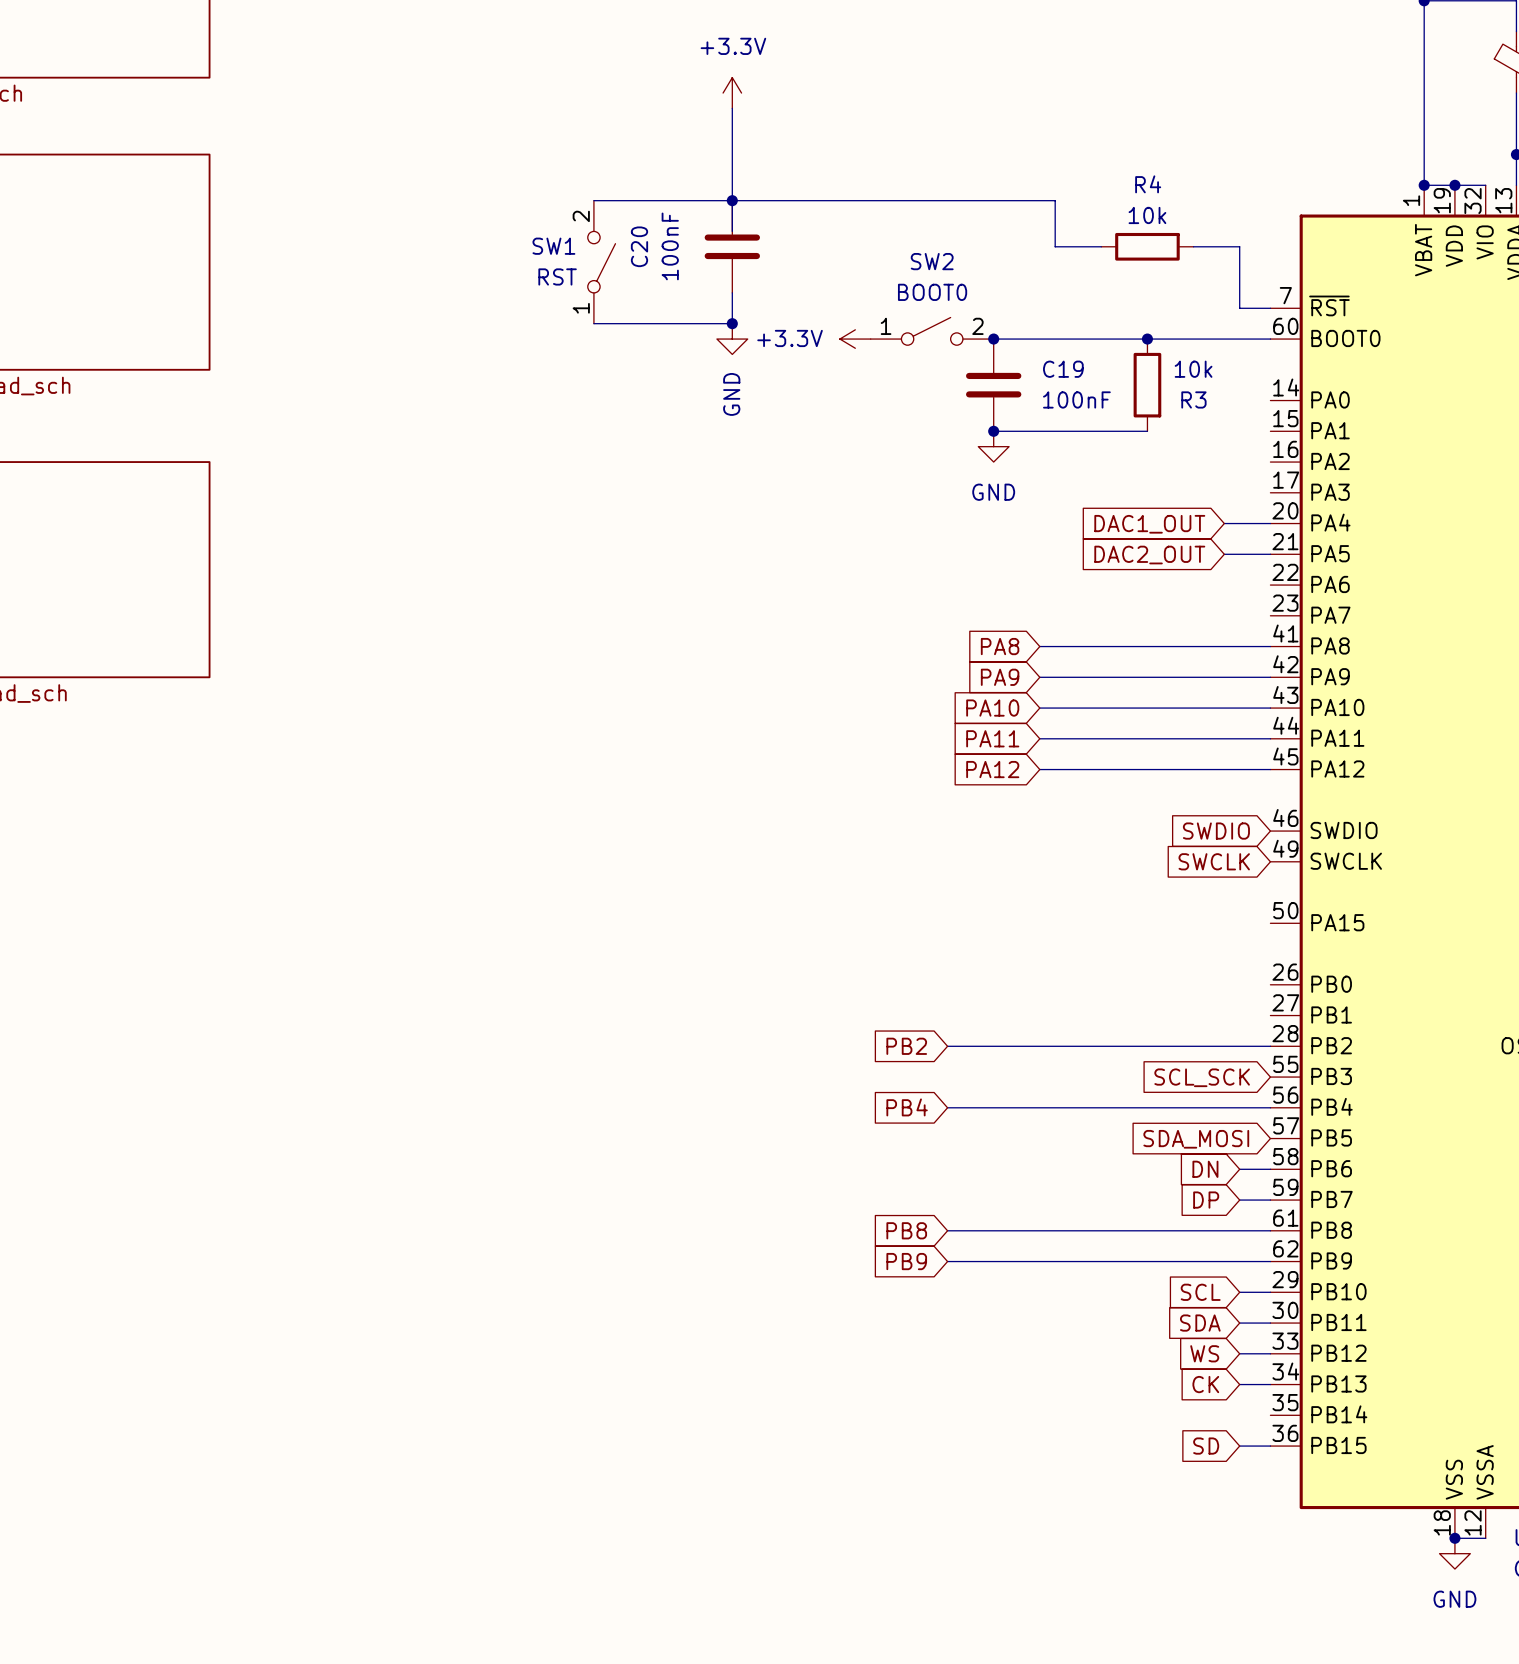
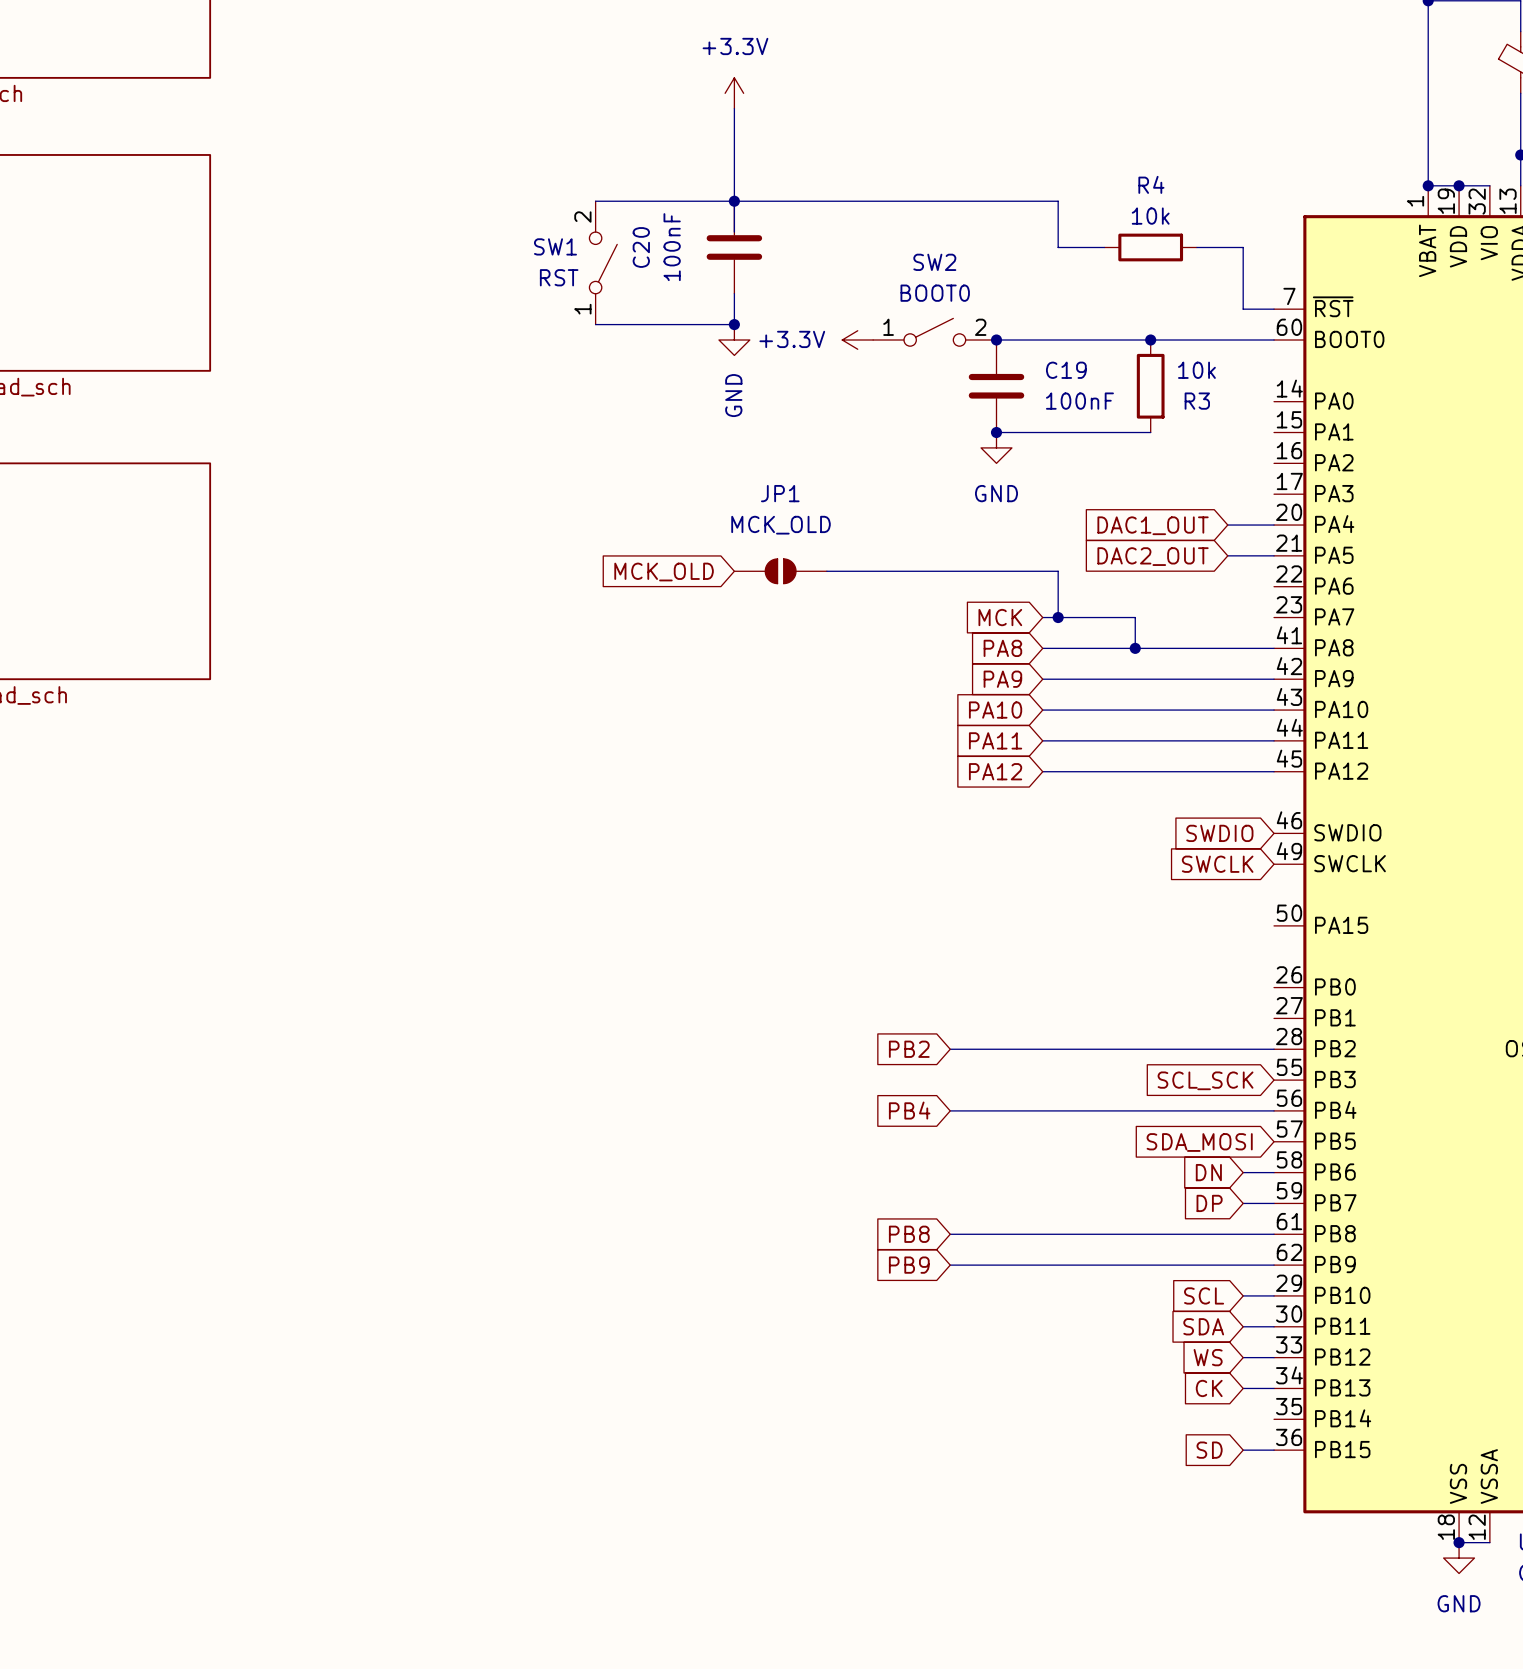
JP1: none -> MCK_OLD (780, 571)
wire: none -> (826, 571) (1058, 571) (1058, 617)
global label: none -> MCK_OLD (664, 572)
global label: none -> MCK (1000, 617)
wire: none -> (1042, 617) (1135, 617) (1135, 648)
junction: none -> (1058, 617)
junction: none -> (1135, 648)

